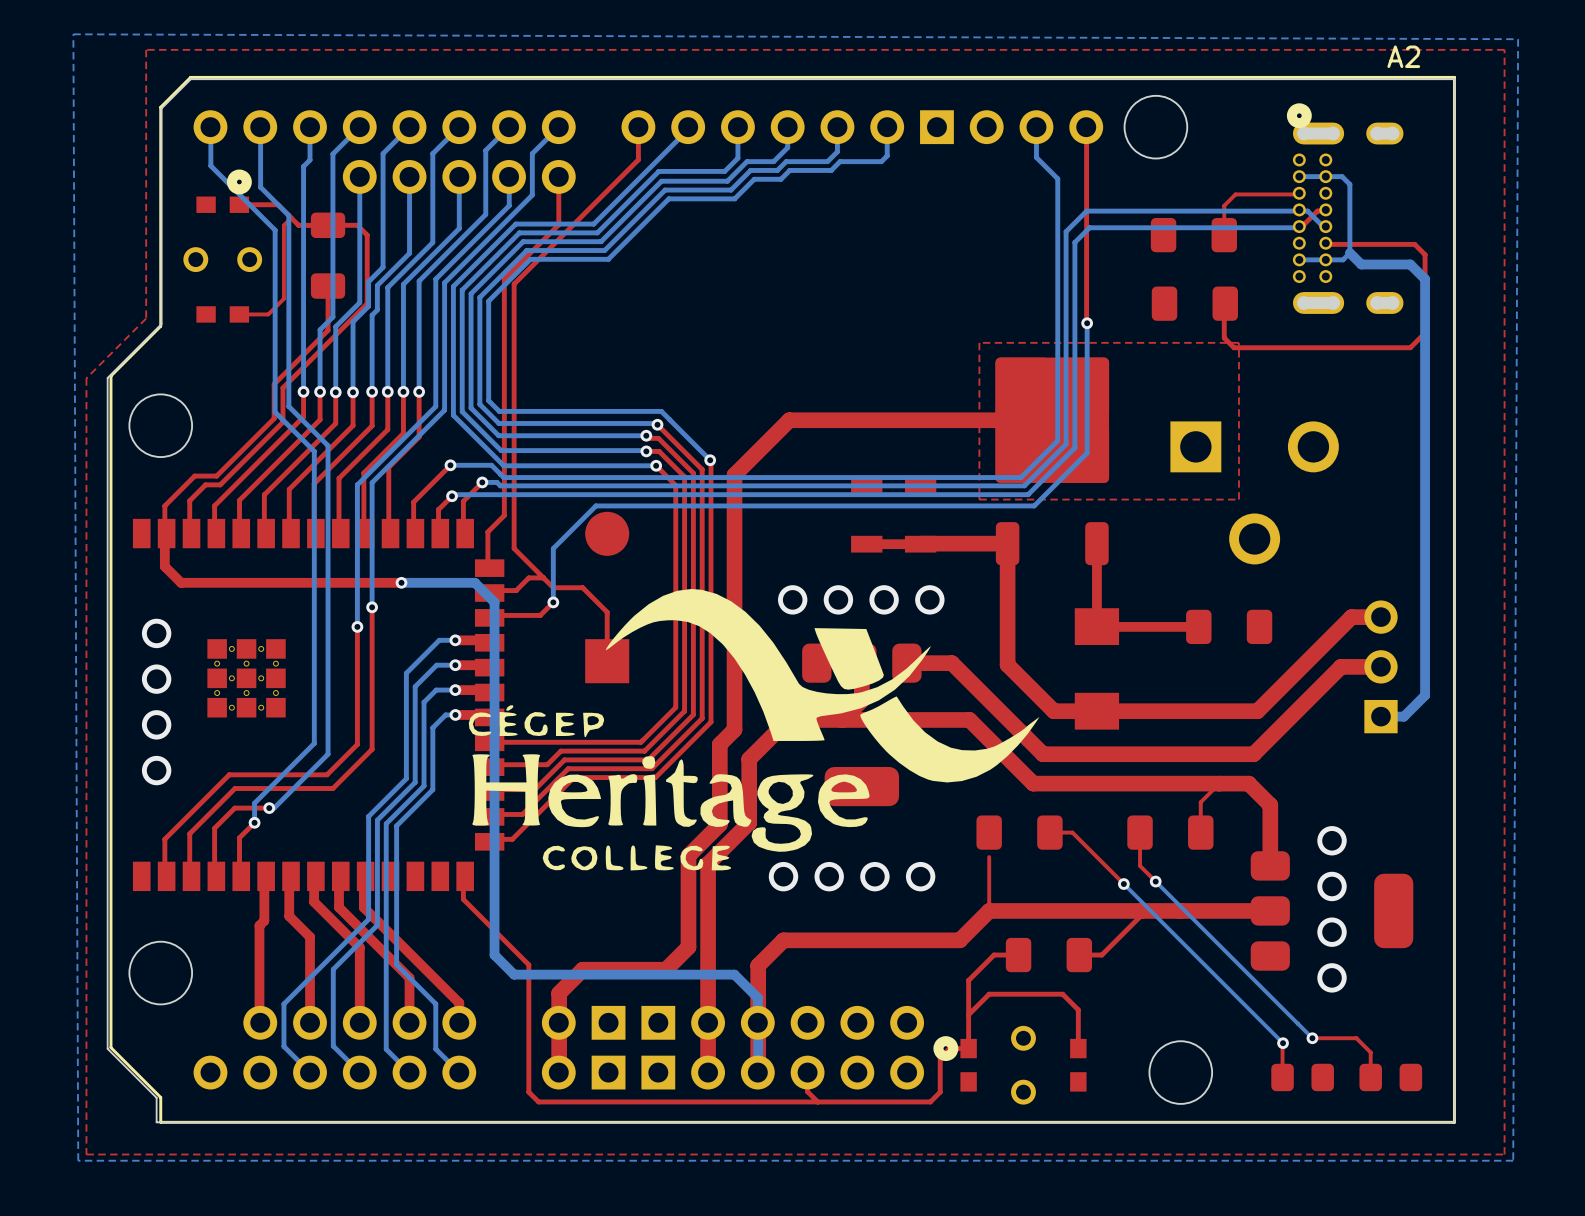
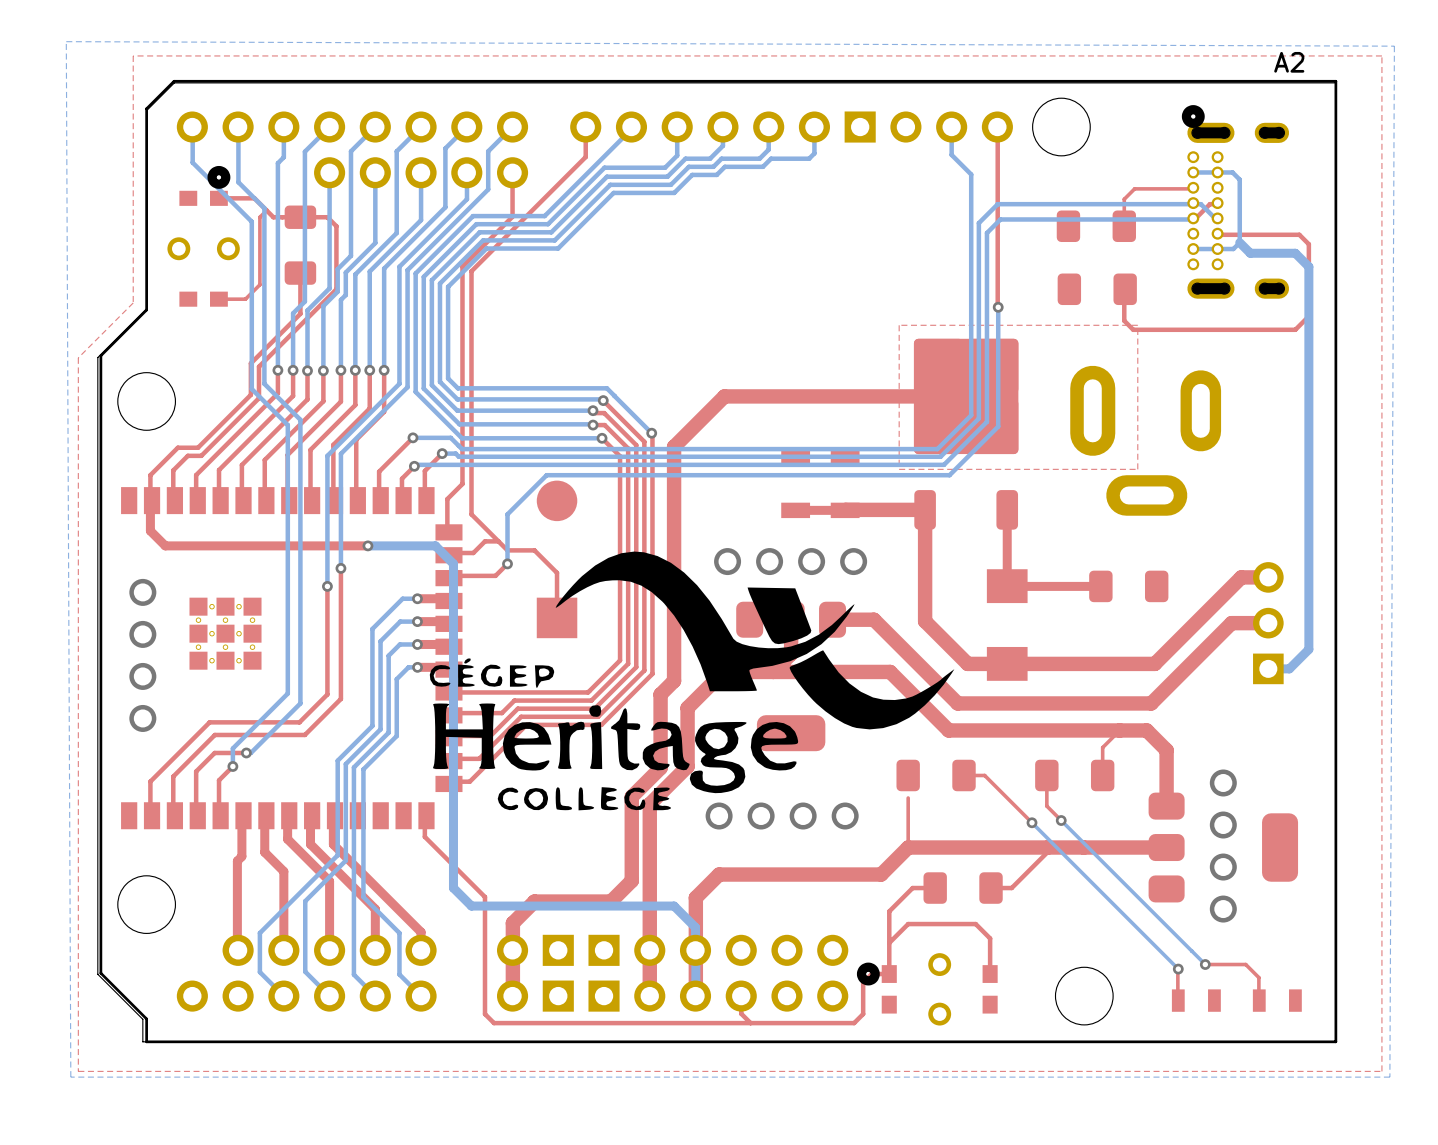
part: none -> (1145, 440)
part: (1254, 492) -> none
part footprint: [1271, 1063, 1334, 1092] -> [1171, 989, 1221, 1012]
part footprint: [1359, 1063, 1423, 1092] -> [1252, 989, 1302, 1012]

